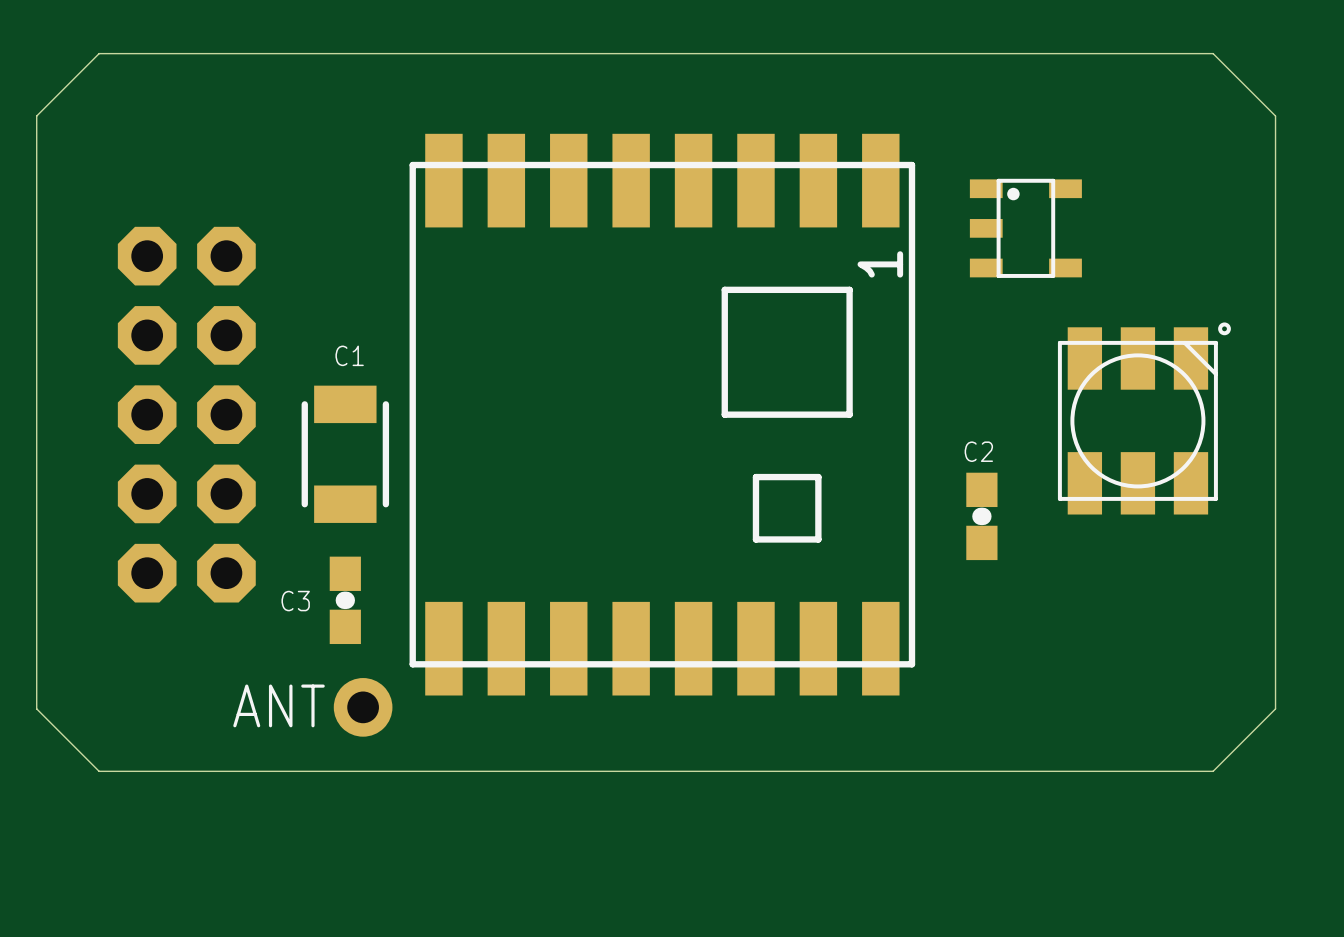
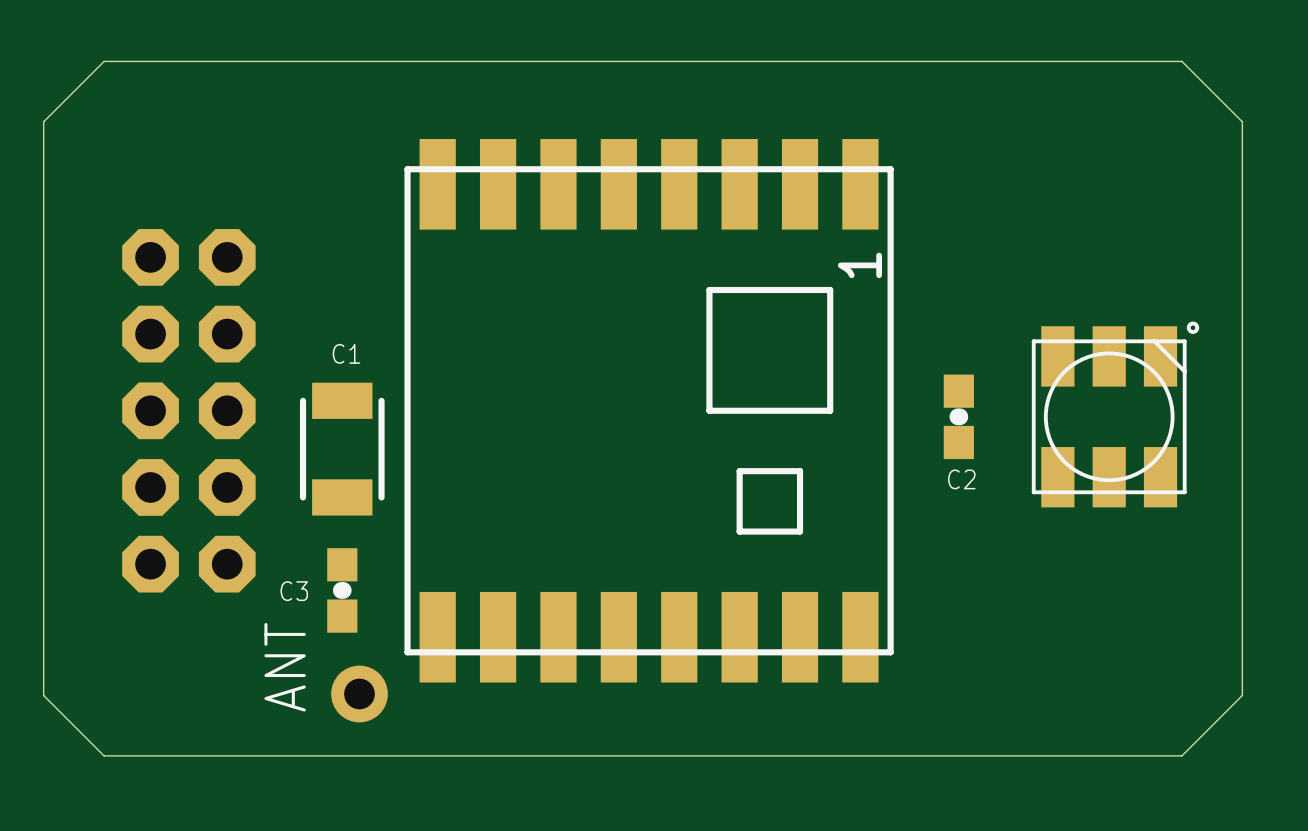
part: (1025, 228) -> none
C2 name position: C2 (978, 451) -> C2 (961, 479)
C2 position: (981, 516) -> (958, 416)
ANT name rotation: 0° (279, 705) -> 90° counterclockwise (285, 667)

